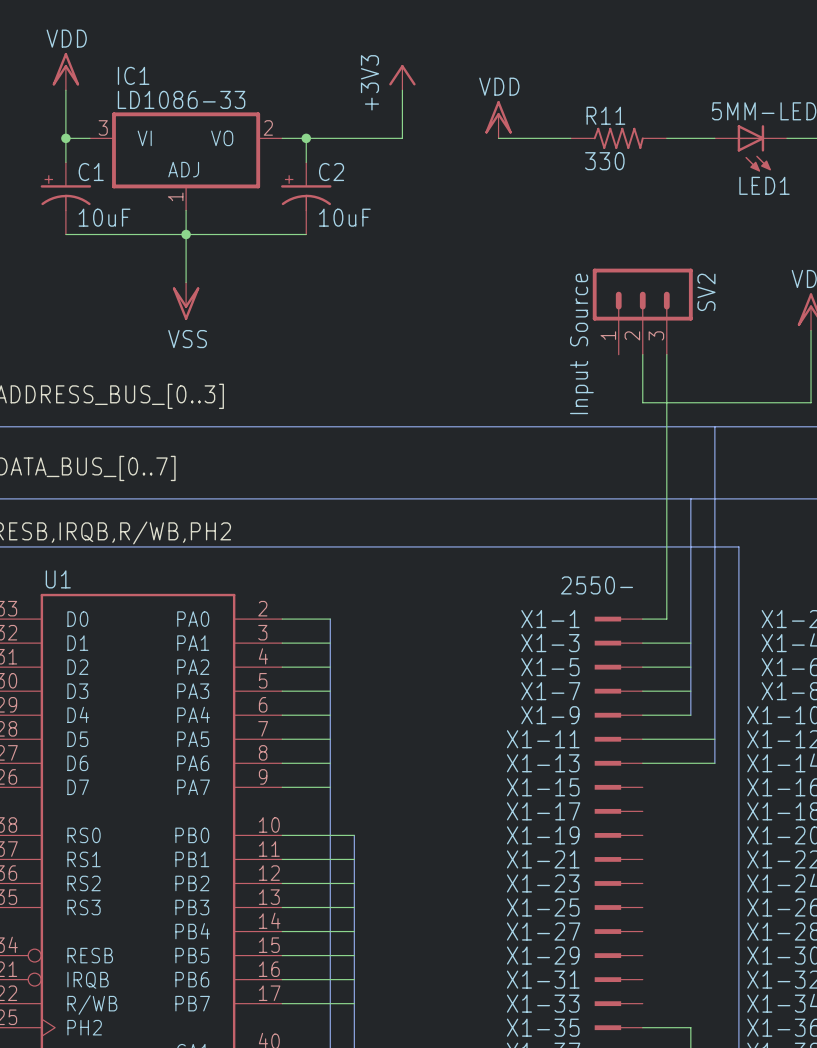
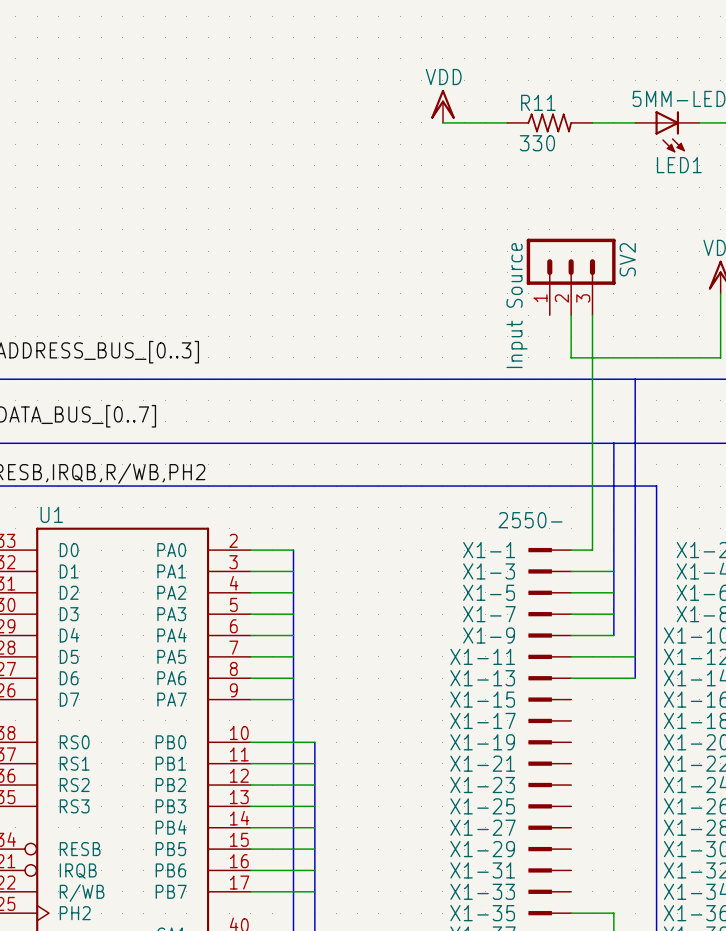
power symbol: VDD (65, 71) -> none
power symbol: +3V3 (402, 77) -> none
wire: (65, 90) (65, 162) -> none
wire: (402, 90) (402, 138) (282, 138) -> none
wire: (65, 138) (89, 138) -> none
junction: (65, 138) -> none
wire: (306, 138) (306, 162) -> none
junction: (306, 138) -> none
IC1: LD1086-33 (186, 161) -> none
C1: 10uF (65, 198) -> none
C2: 10uF (306, 198) -> none
wire: (186, 210) (186, 282) -> none
wire: (65, 234) (306, 234) -> none
junction: (186, 234) -> none
power symbol: VSS (186, 301) -> none

